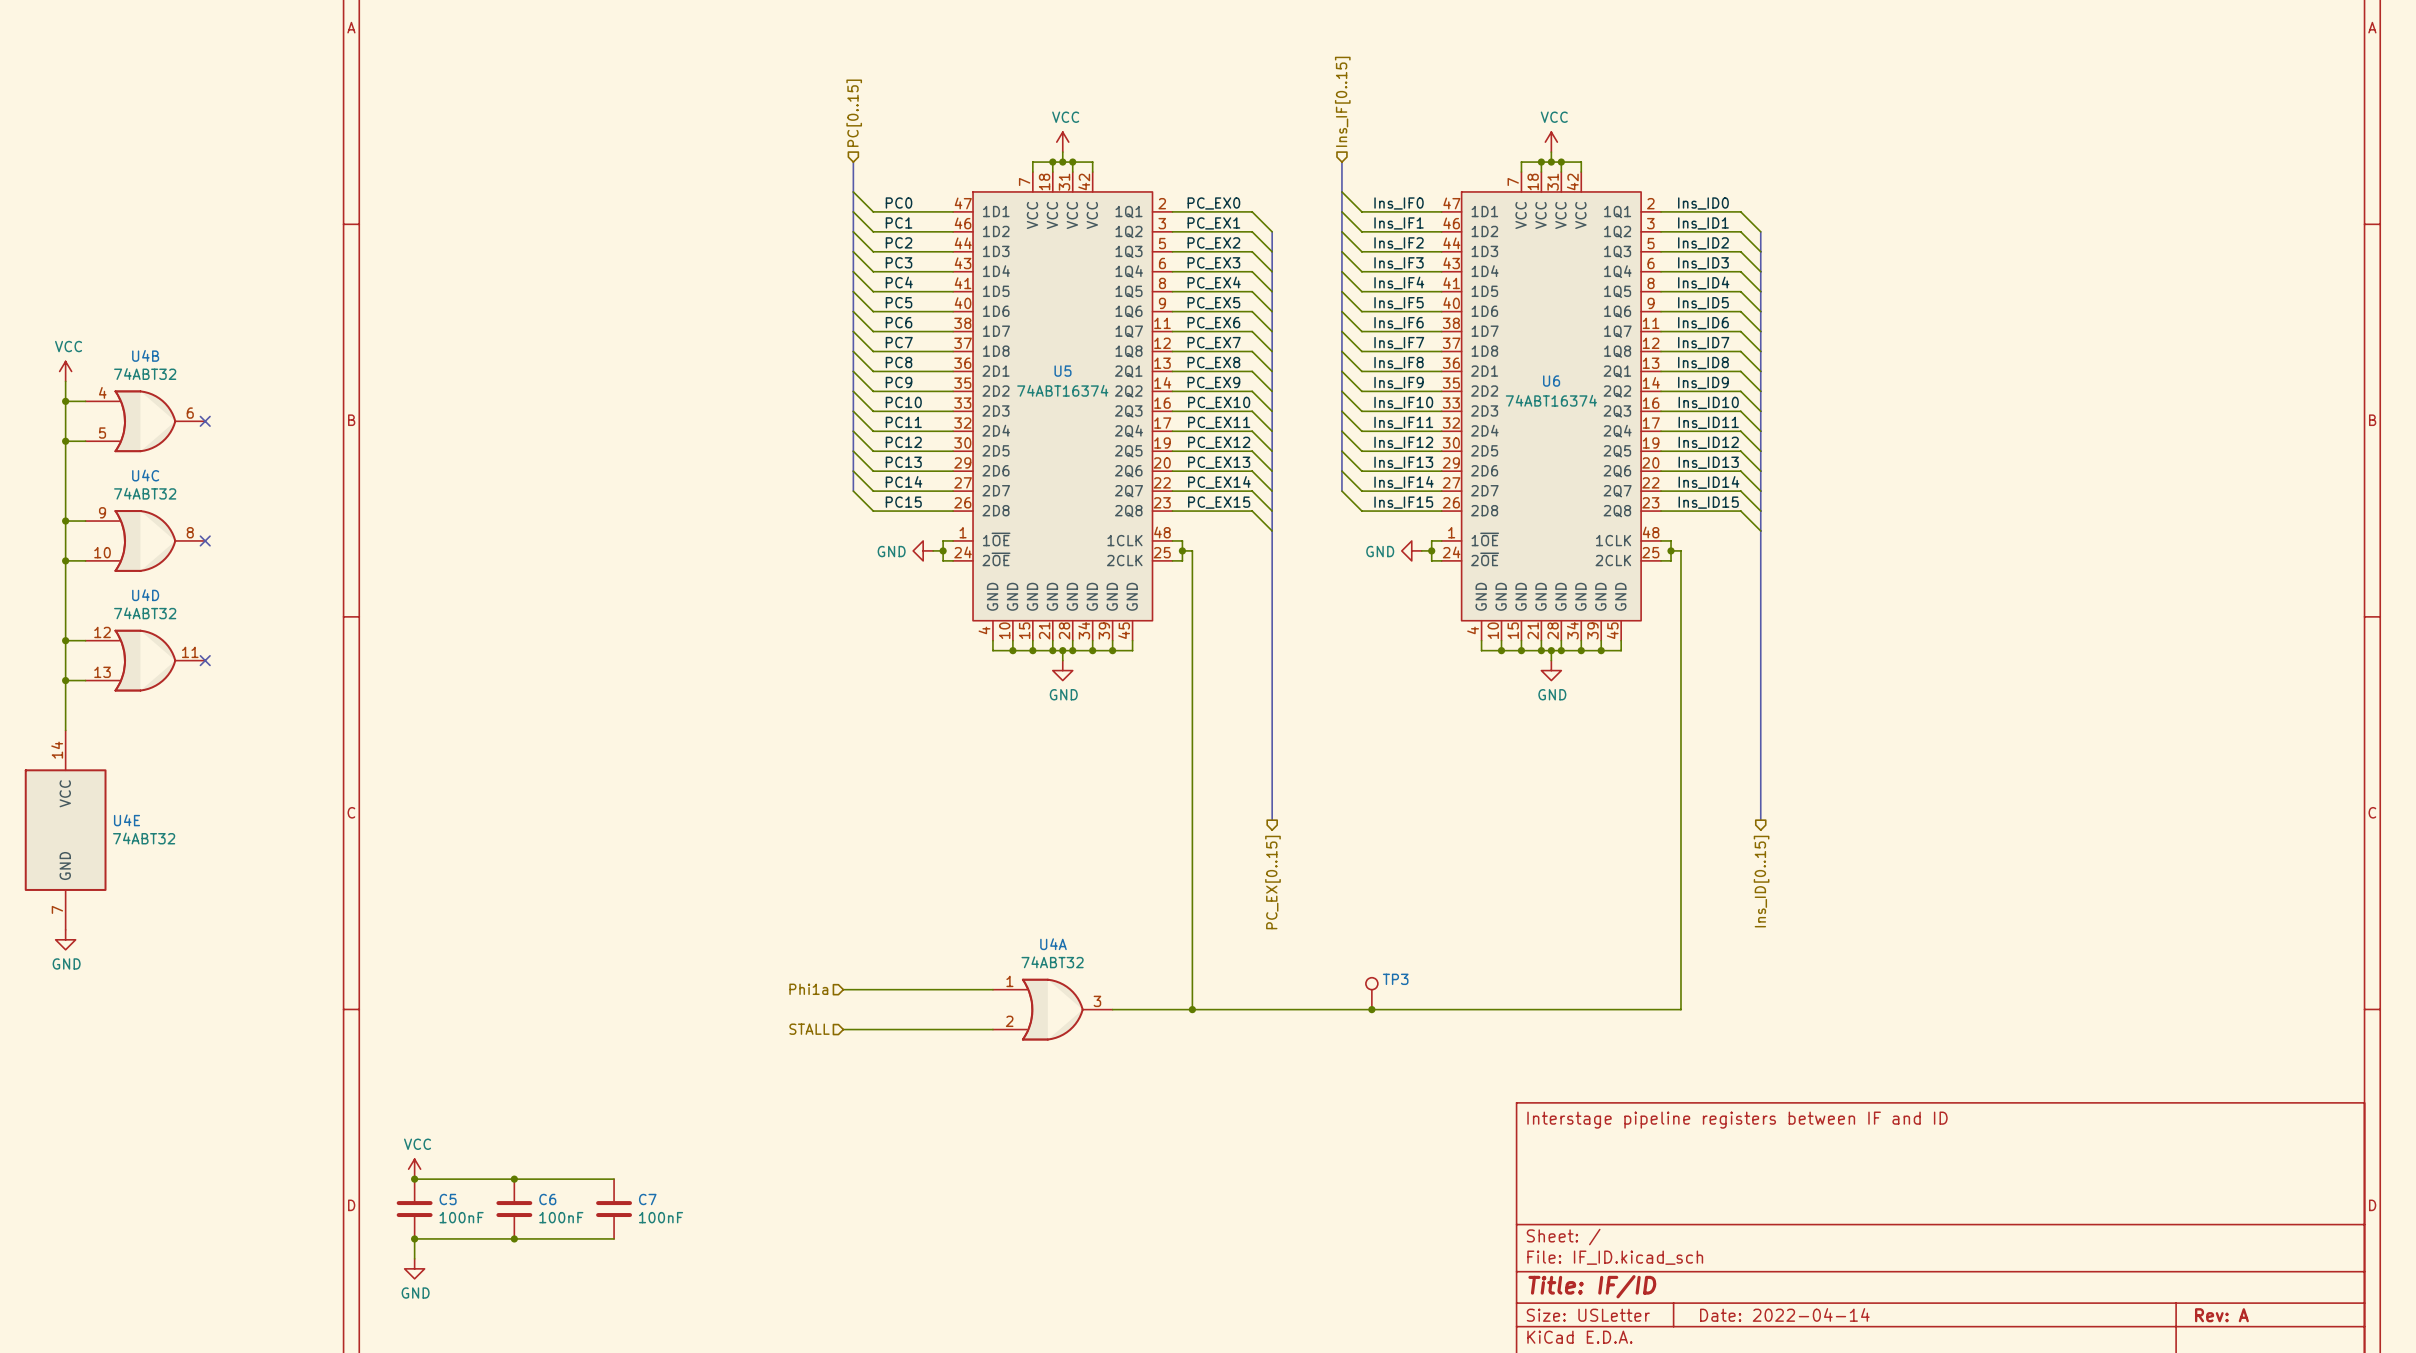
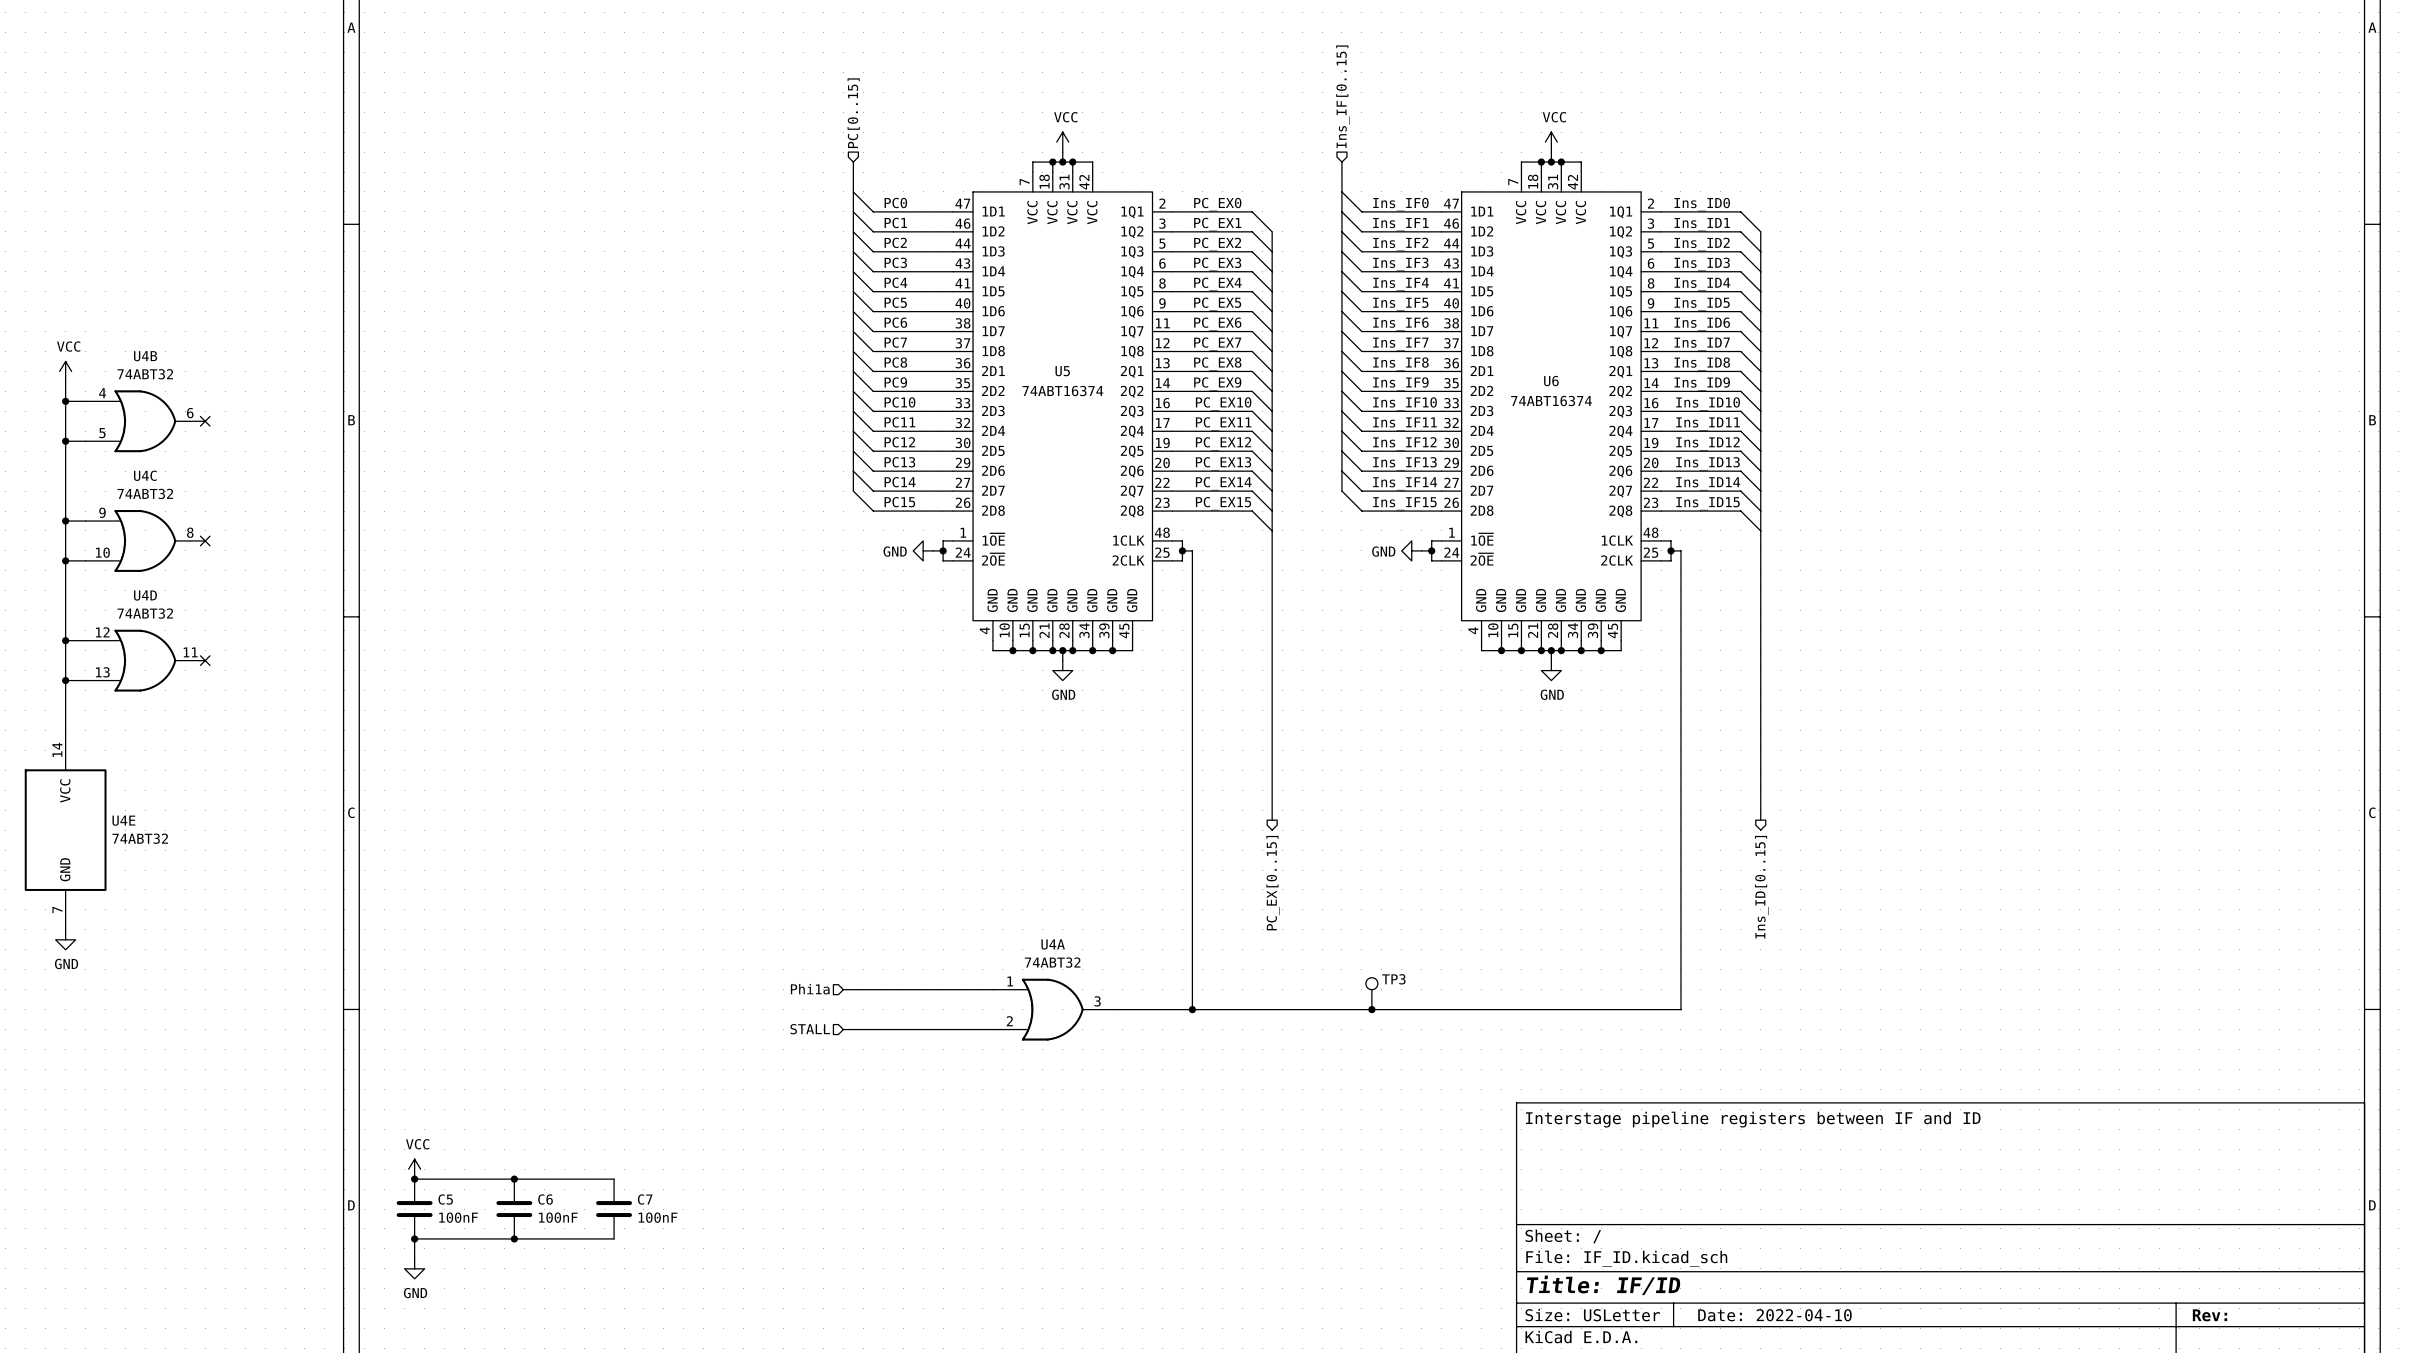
title block: Date: 2022-04-14 (1784, 1314) -> Date: 2022-04-10 (1774, 1315)
title block: Rev: A (2221, 1315) -> Rev: (2210, 1315)

